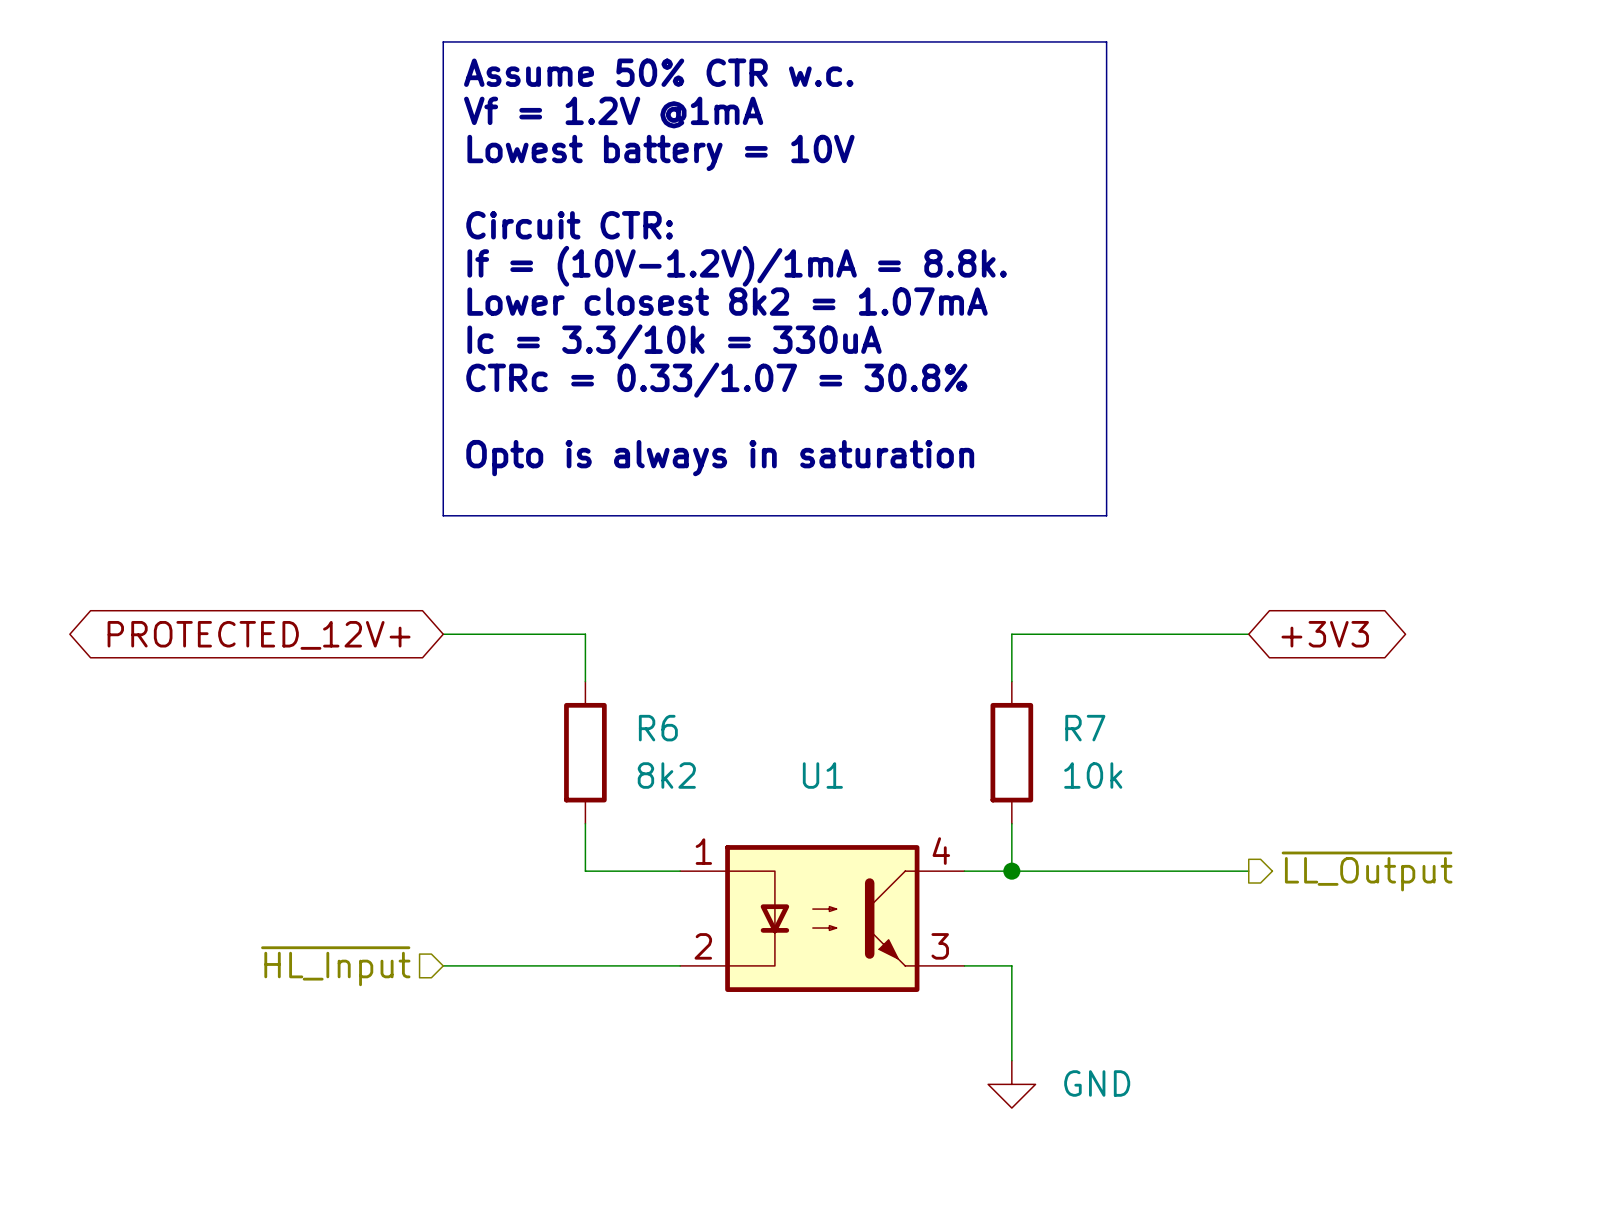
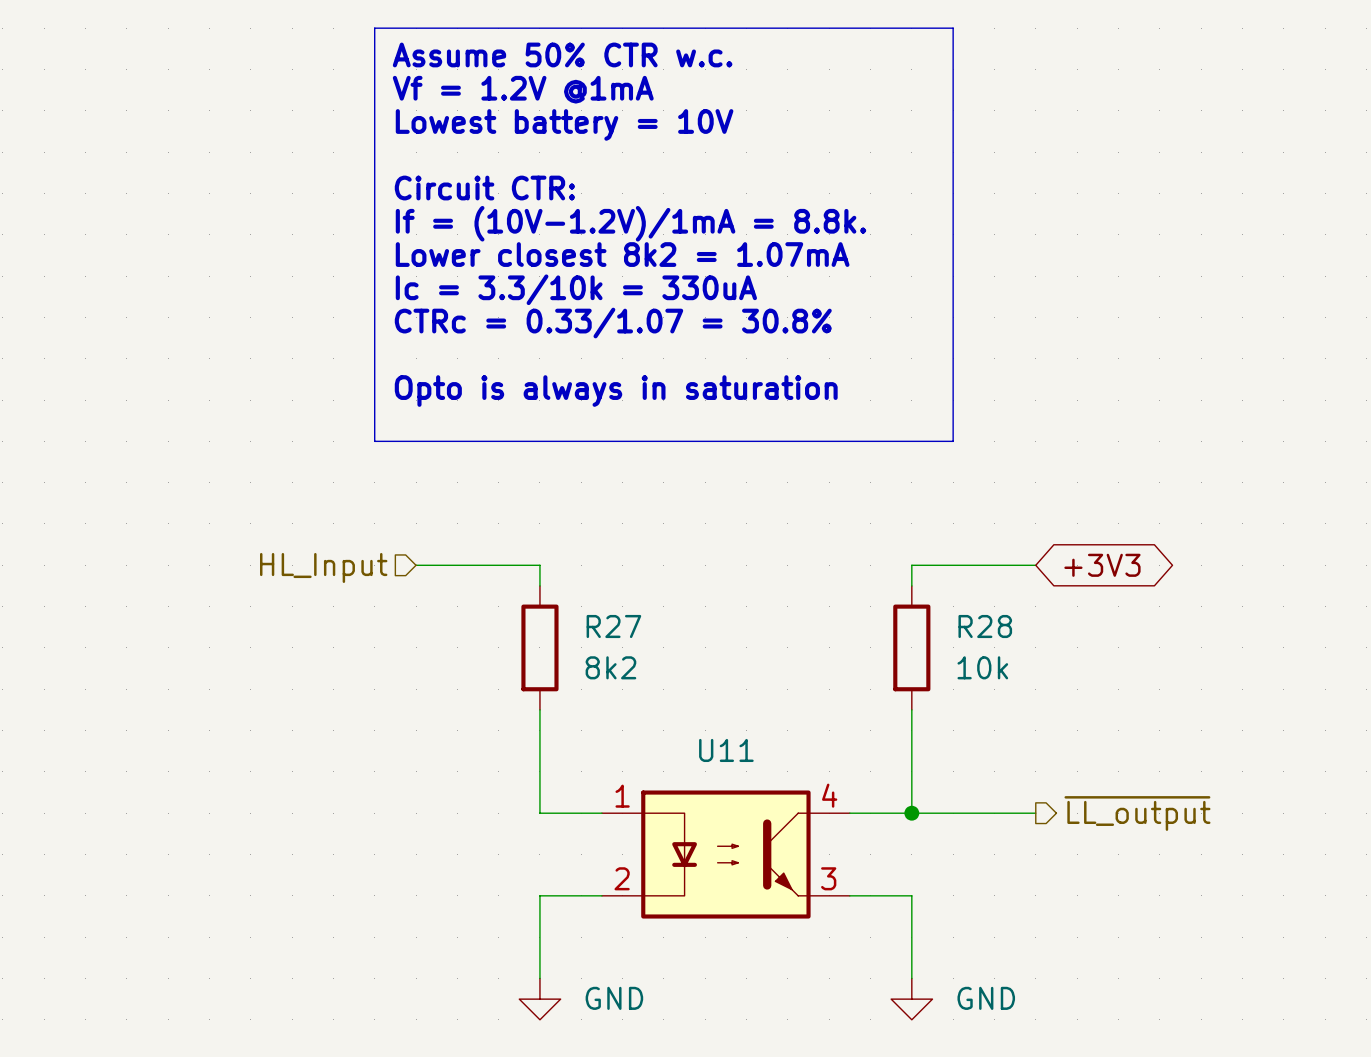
wire: (443, 634) (585, 634) (585, 681) -> none
wire: (1248, 634) (1011, 634) (1011, 681) -> none
global label position: +3V3 (1325, 634) -> +3V3 (1102, 565)
global label: PROTECTED_12V+ (259, 635) -> none
wire: none -> (416, 565) (539, 565) (539, 585)
wire: none -> (1035, 565) (911, 565) (911, 585)
hierarchical label: none -> HL_Input (323, 567)
R6: 8k2 (585, 752) -> none
R27: none -> 8k2 (539, 647)
R7: 10k (1011, 752) -> none
R28: none -> 10k (911, 647)
wire: (585, 823) (585, 871) (680, 871) -> none
wire: none -> (539, 709) (539, 813) (601, 813)
wire: (1011, 823) (1011, 871) -> none
wire: none -> (911, 709) (911, 813)
wire: (964, 871) (1248, 871) -> none
junction position: (1011, 871) -> (911, 813)
hierarchical label: ~{LL_Output} (1367, 871) -> none
U1: (822, 918) -> none
wire: none -> (849, 813) (1035, 813)
hierarchical label: none -> ~{LL_output} (1137, 813)
wire: (443, 965) (680, 965) -> none
wire: (964, 965) (1011, 965) (1011, 1060) -> none
hierarchical label: ~{HL_Input} (335, 966) -> none
U11: none -> (725, 854)
wire: none -> (601, 895) (539, 895) (539, 978)
wire: none -> (849, 895) (911, 895) (911, 978)
power symbol position: GND (1011, 1084) -> GND (911, 999)
power symbol: none -> GND (539, 999)

